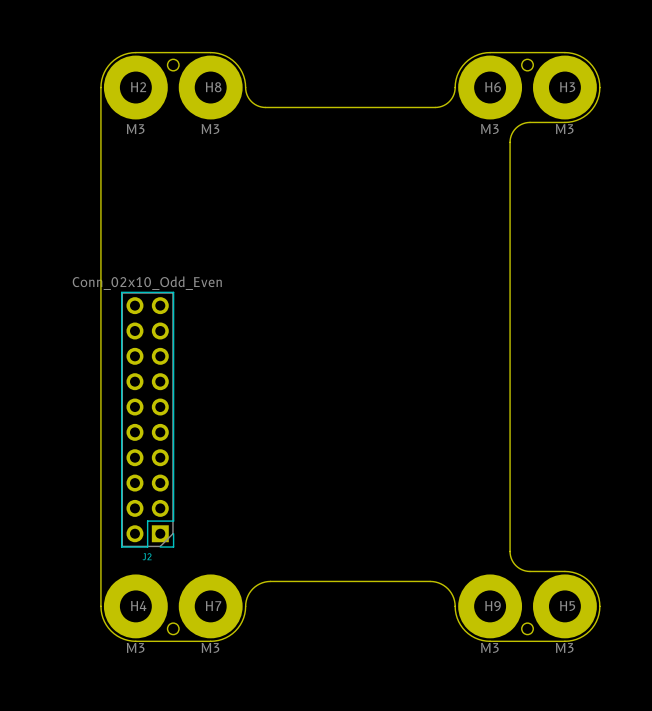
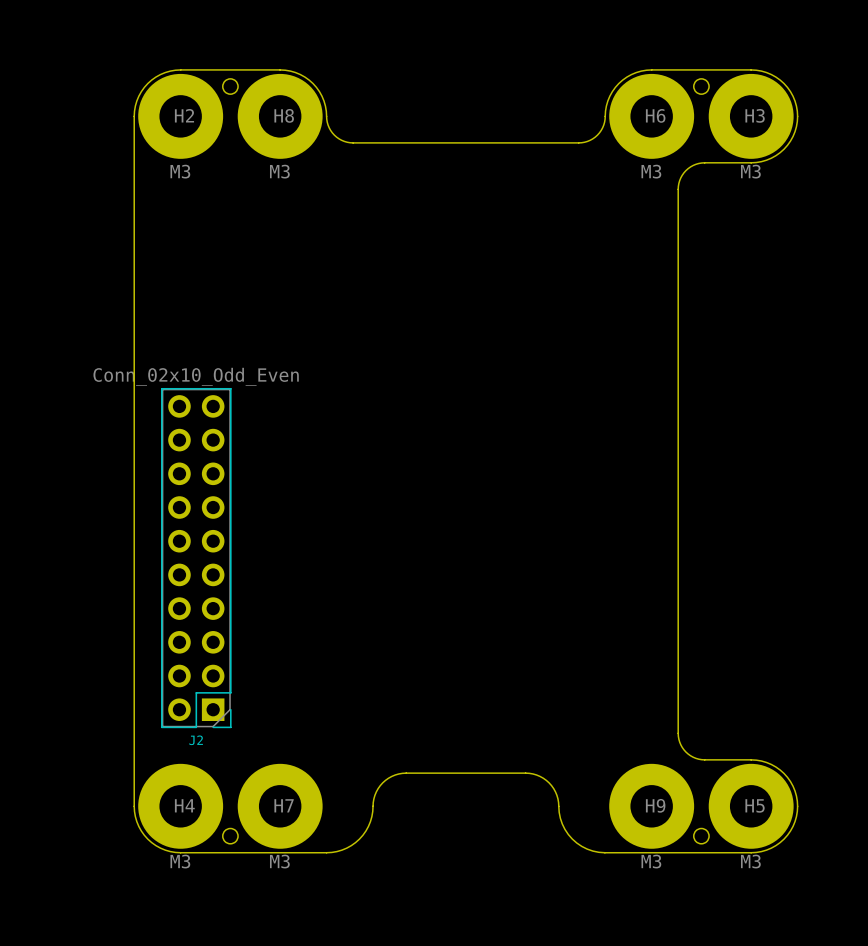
board edge: (305, 581) (267, 581) (257, 585) (248, 595) (243, 617) (238, 628) (225, 637) (210, 641) -> (406, 773) (391, 776) (380, 785) (374, 795) (368, 826) (359, 839) (351, 845) (331, 852) (280, 852)
board edge: (395, 581) (433, 581) (443, 585) (452, 595) (457, 617) (462, 628) (474, 637) (490, 641) -> (525, 773) (540, 776) (551, 785) (556, 795) (560, 818) (564, 829) (572, 839) (581, 846) (598, 852) (651, 852)

